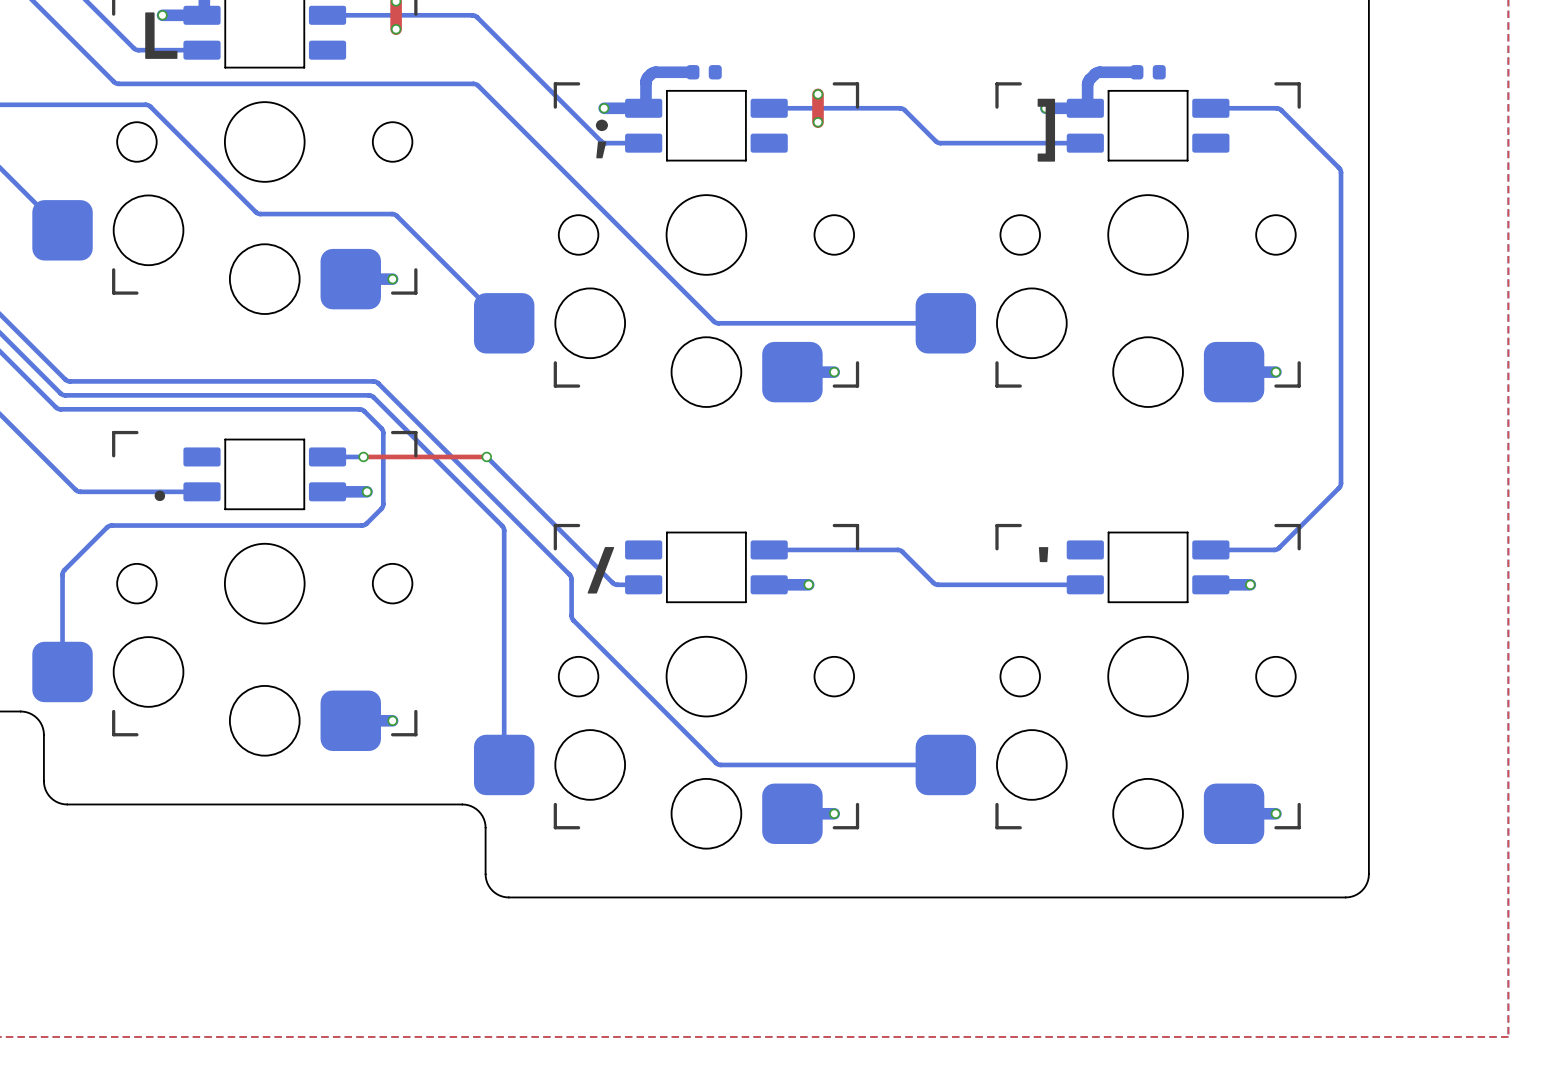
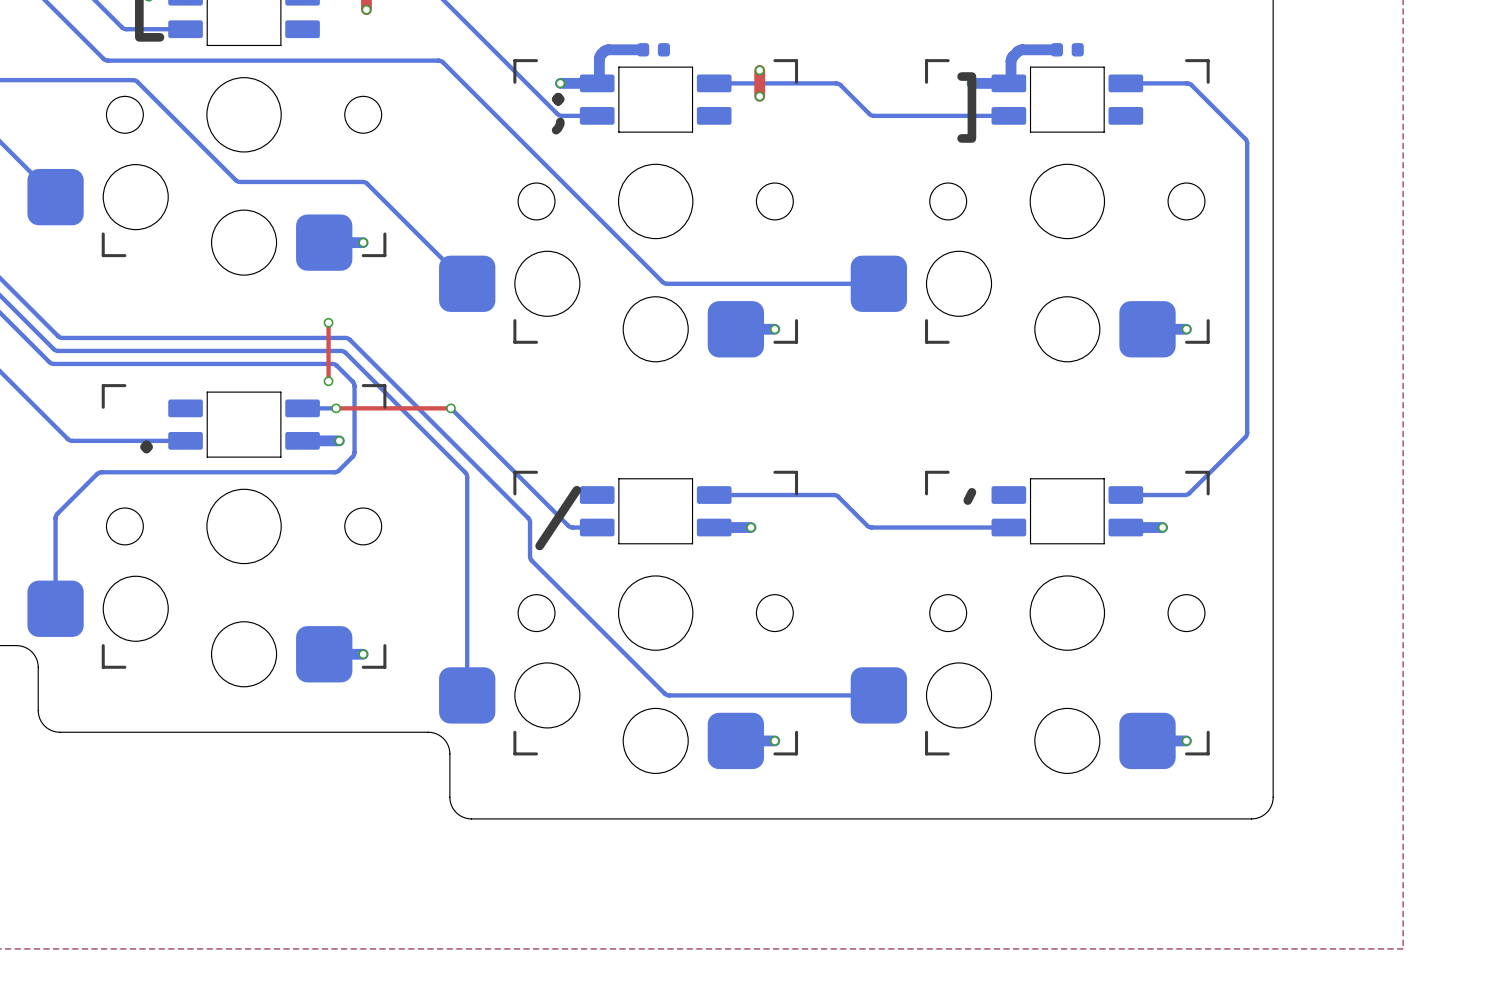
top track: none -> (328, 322) (328, 381)
via: none -> (328, 322)
via: none -> (328, 381)

